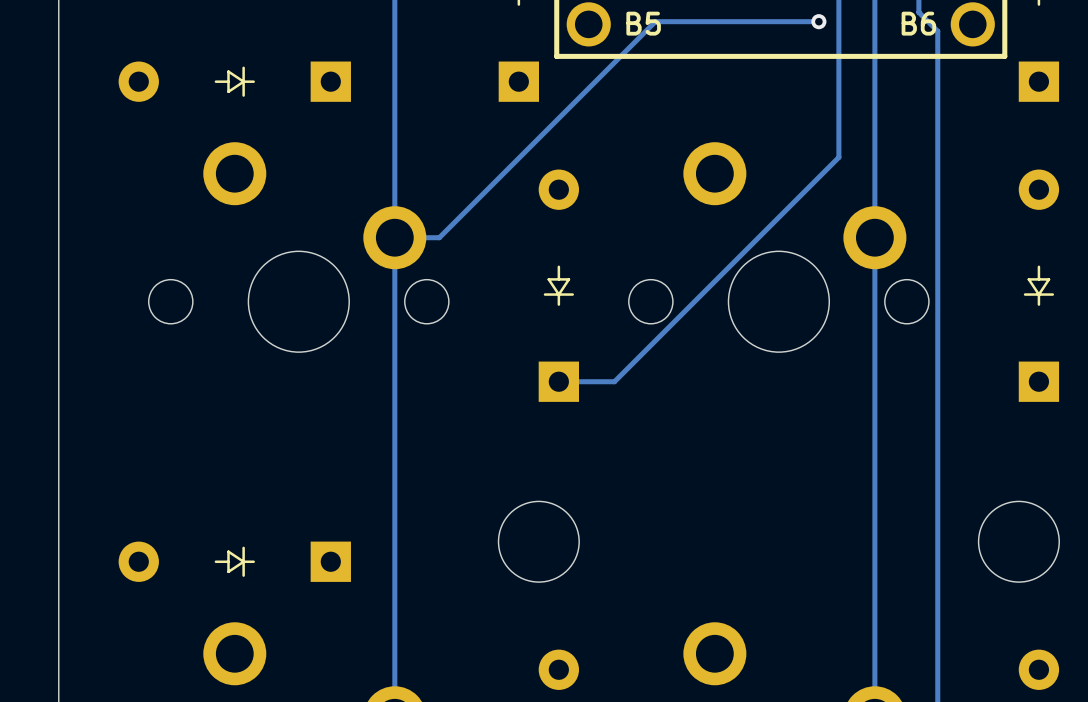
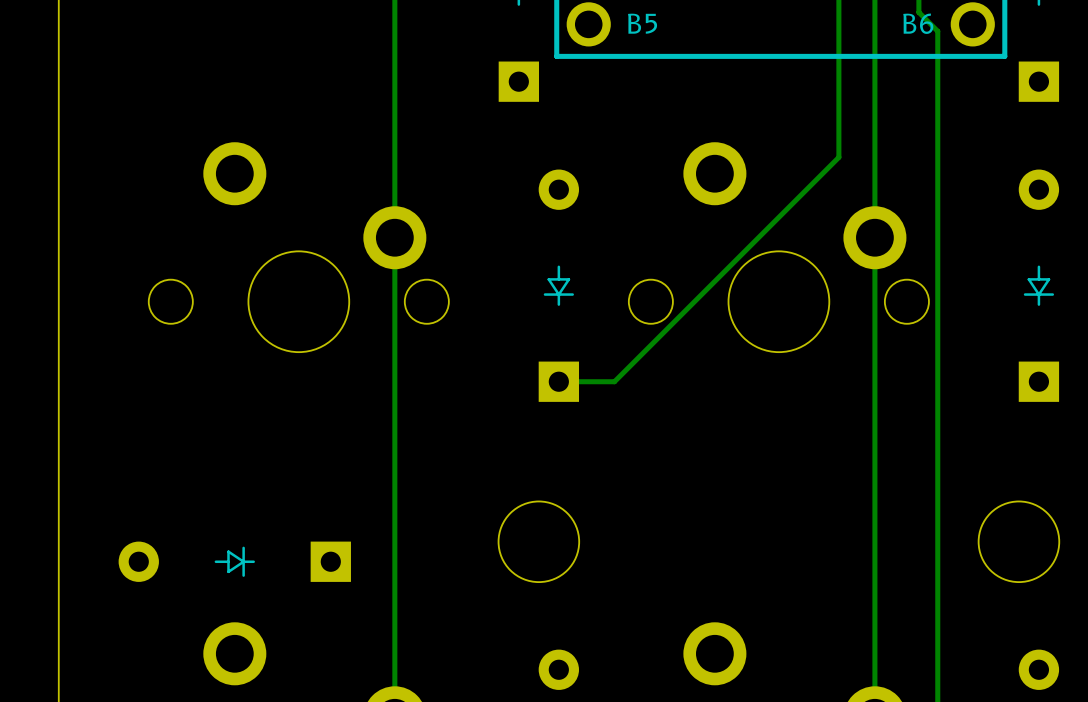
track: (818, 21) (655, 21) (439, 237) (394, 237) -> none
via: (818, 21) -> none
part: (234, 81) -> none

